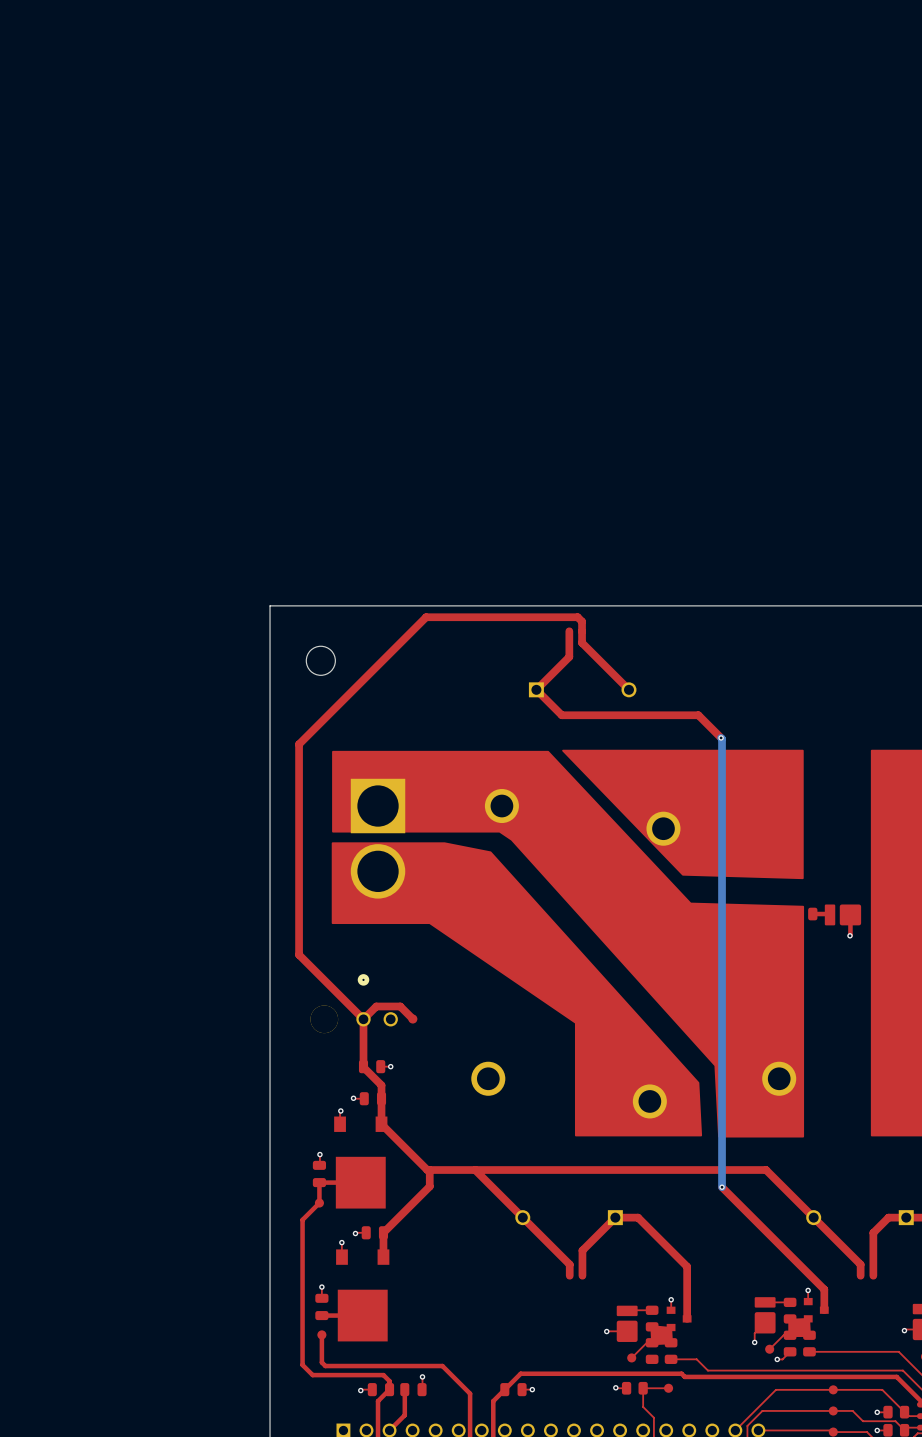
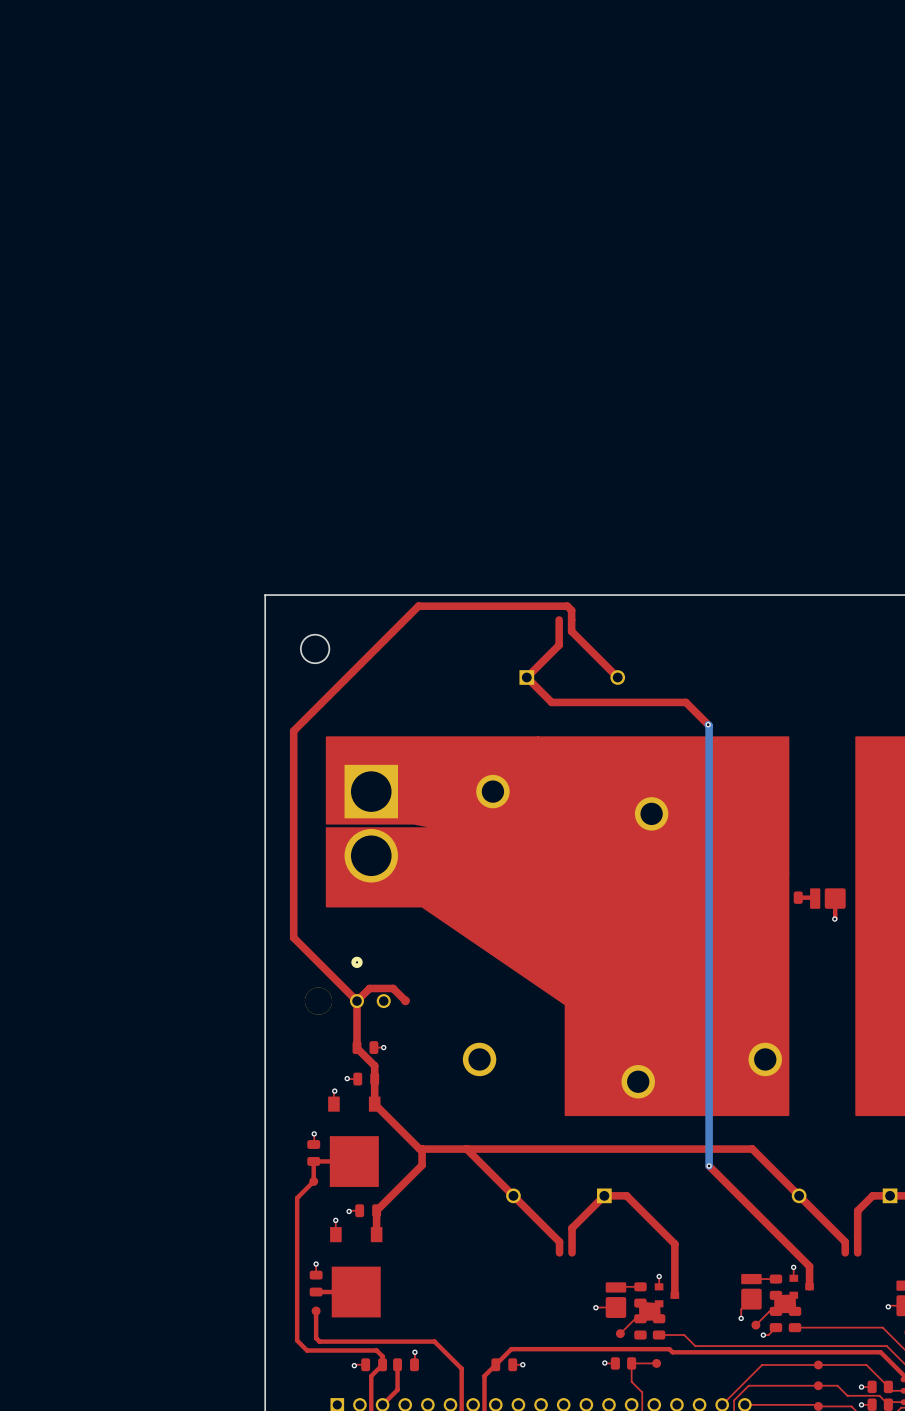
drawing: none -> [537, 736, 790, 874]
drawing: [562, 749, 804, 880] -> none
drawing shape: [332, 750, 805, 1138] -> [325, 736, 790, 1117]

